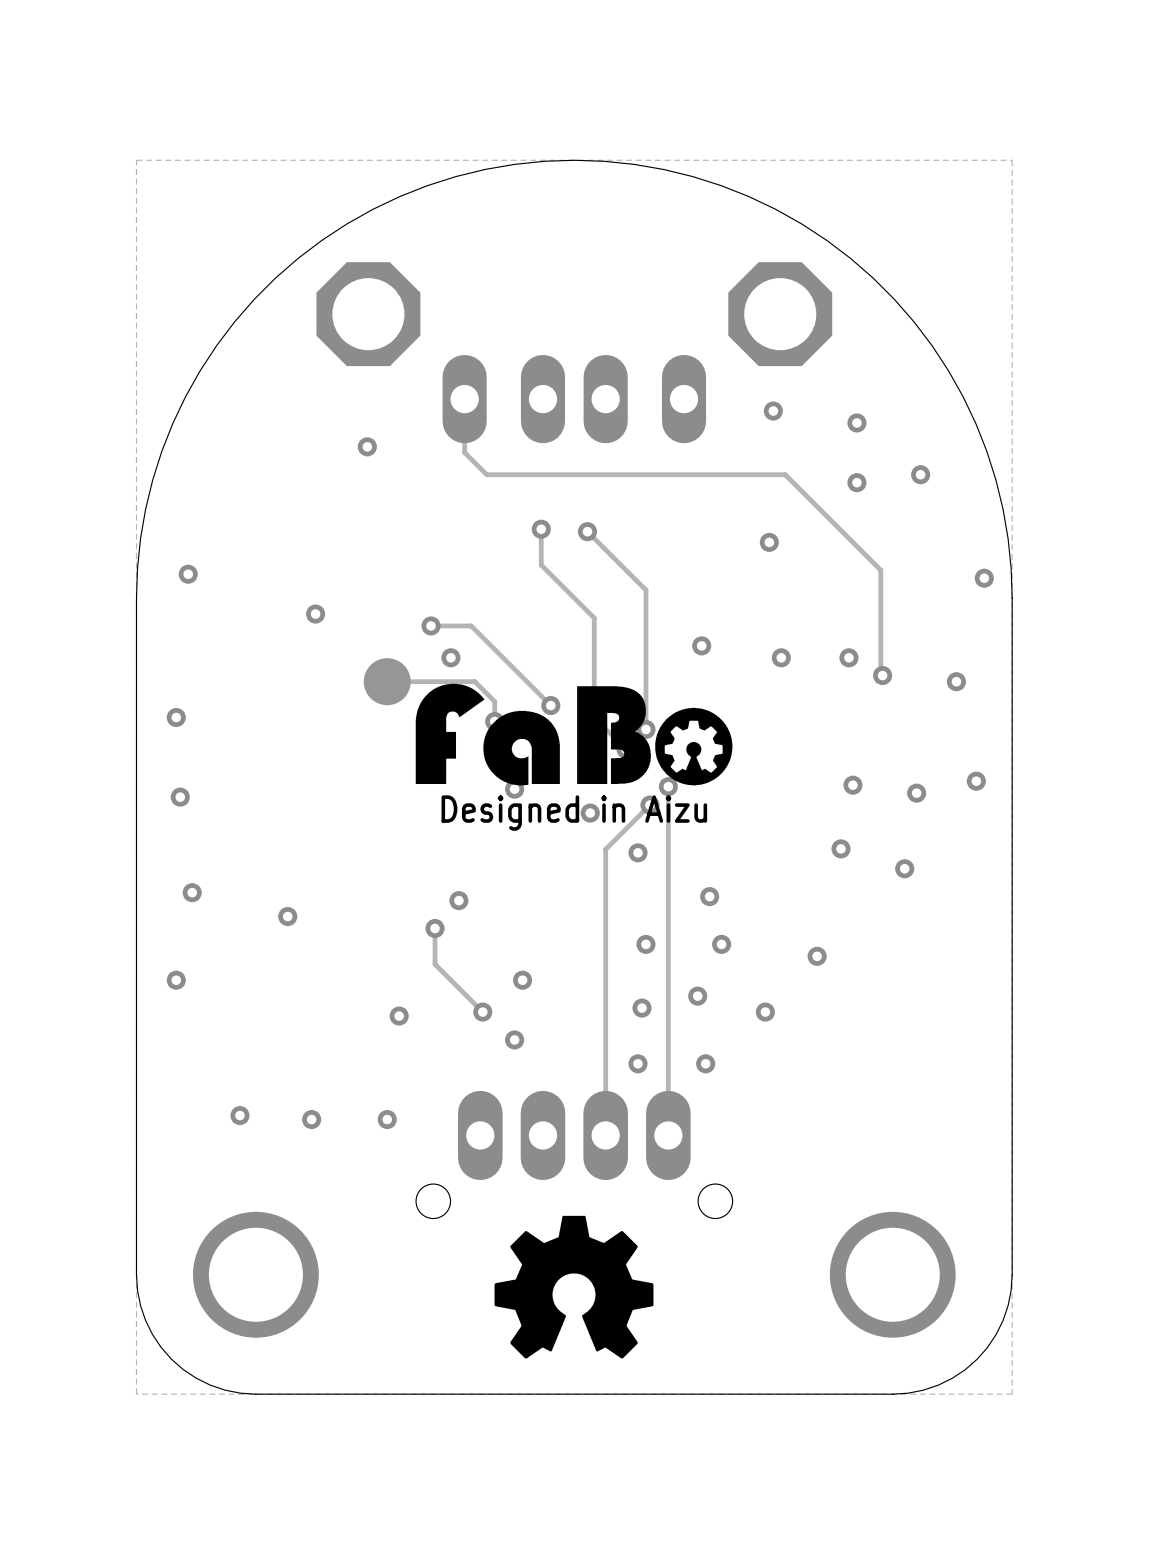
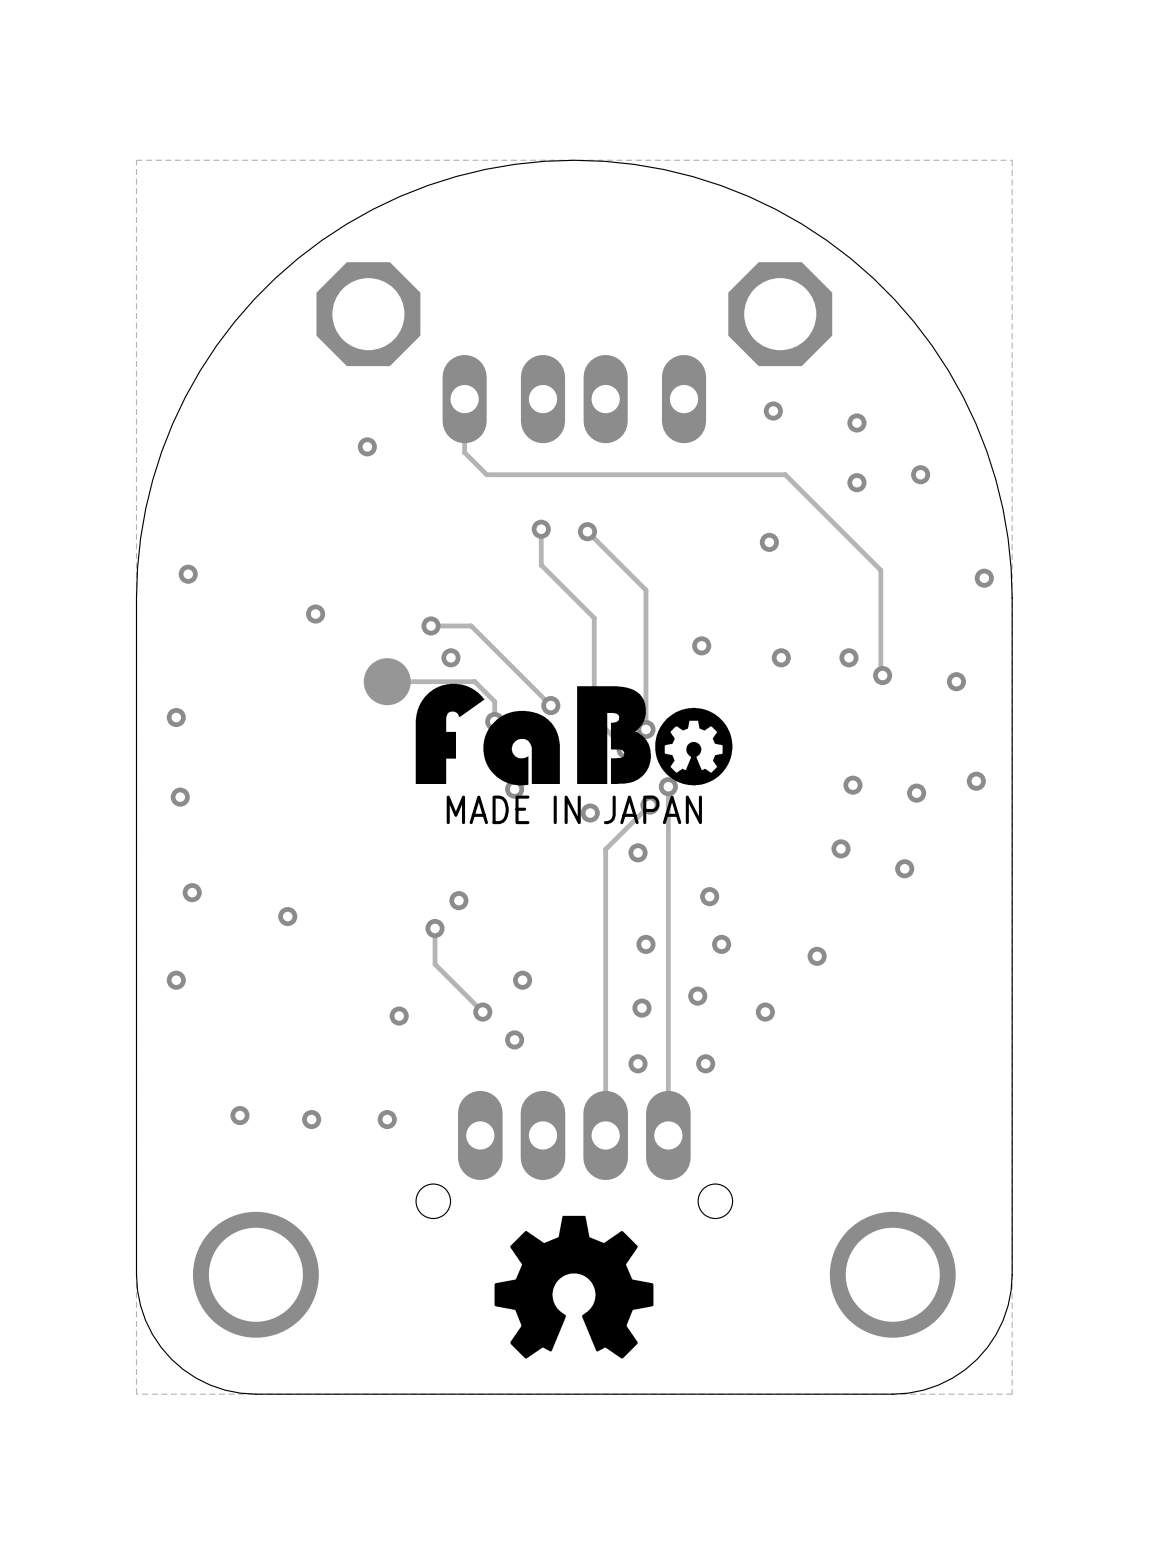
text: Designed in Aizu (574, 813) -> MADE IN JAPAN (574, 809)

